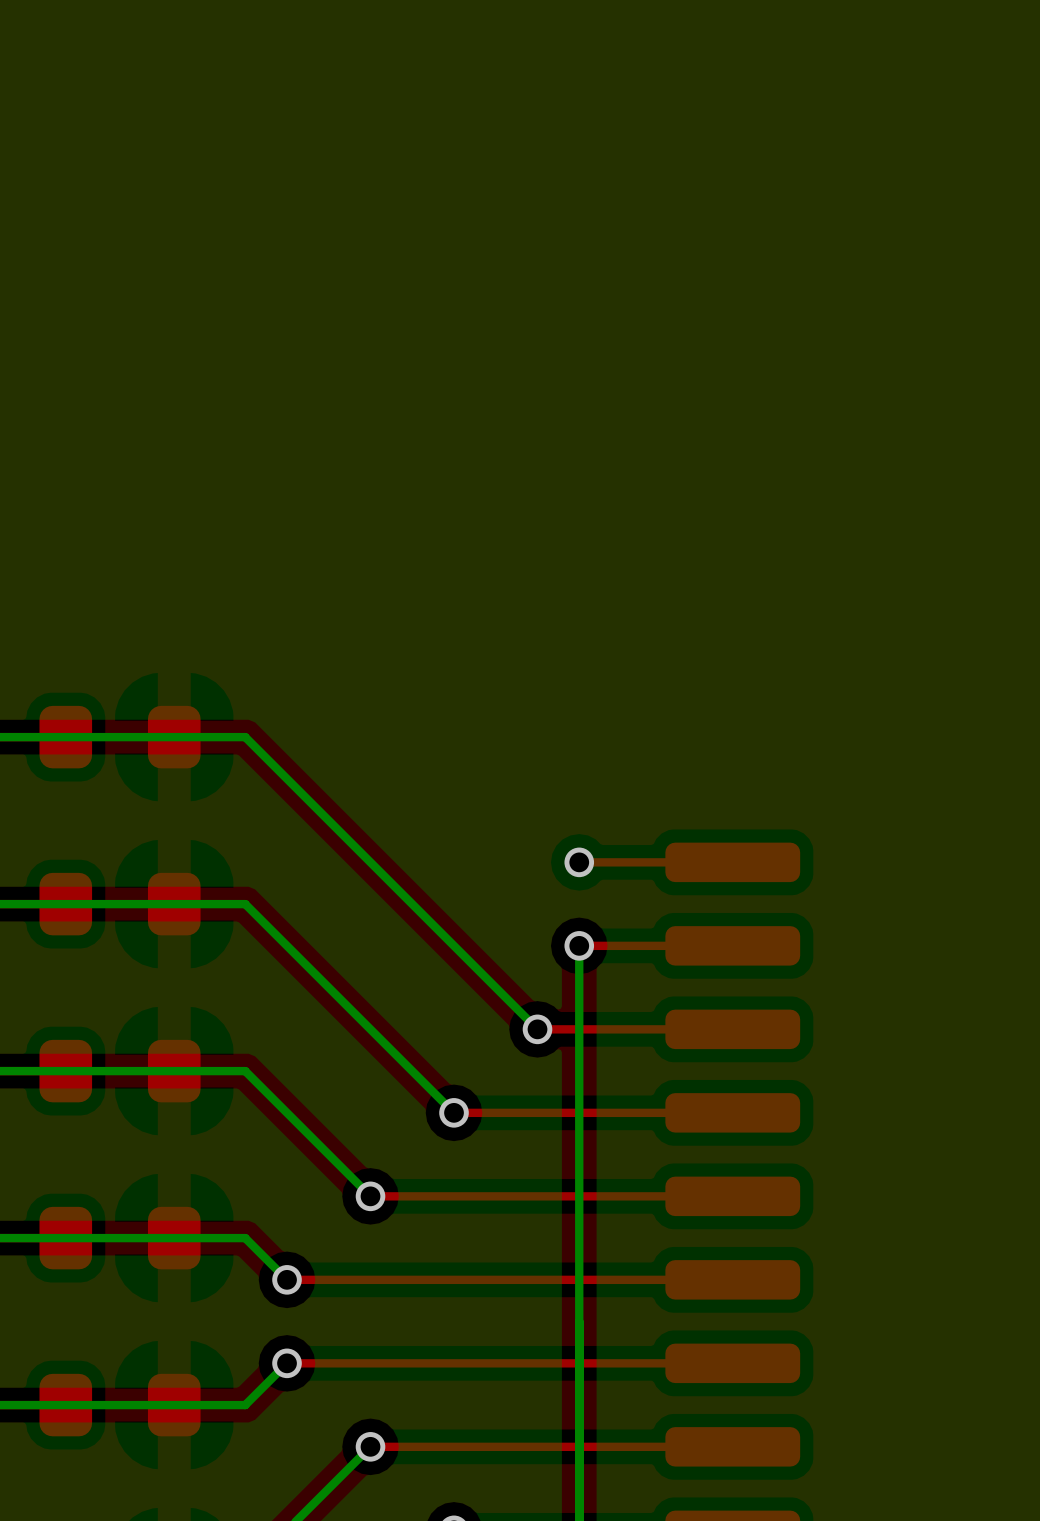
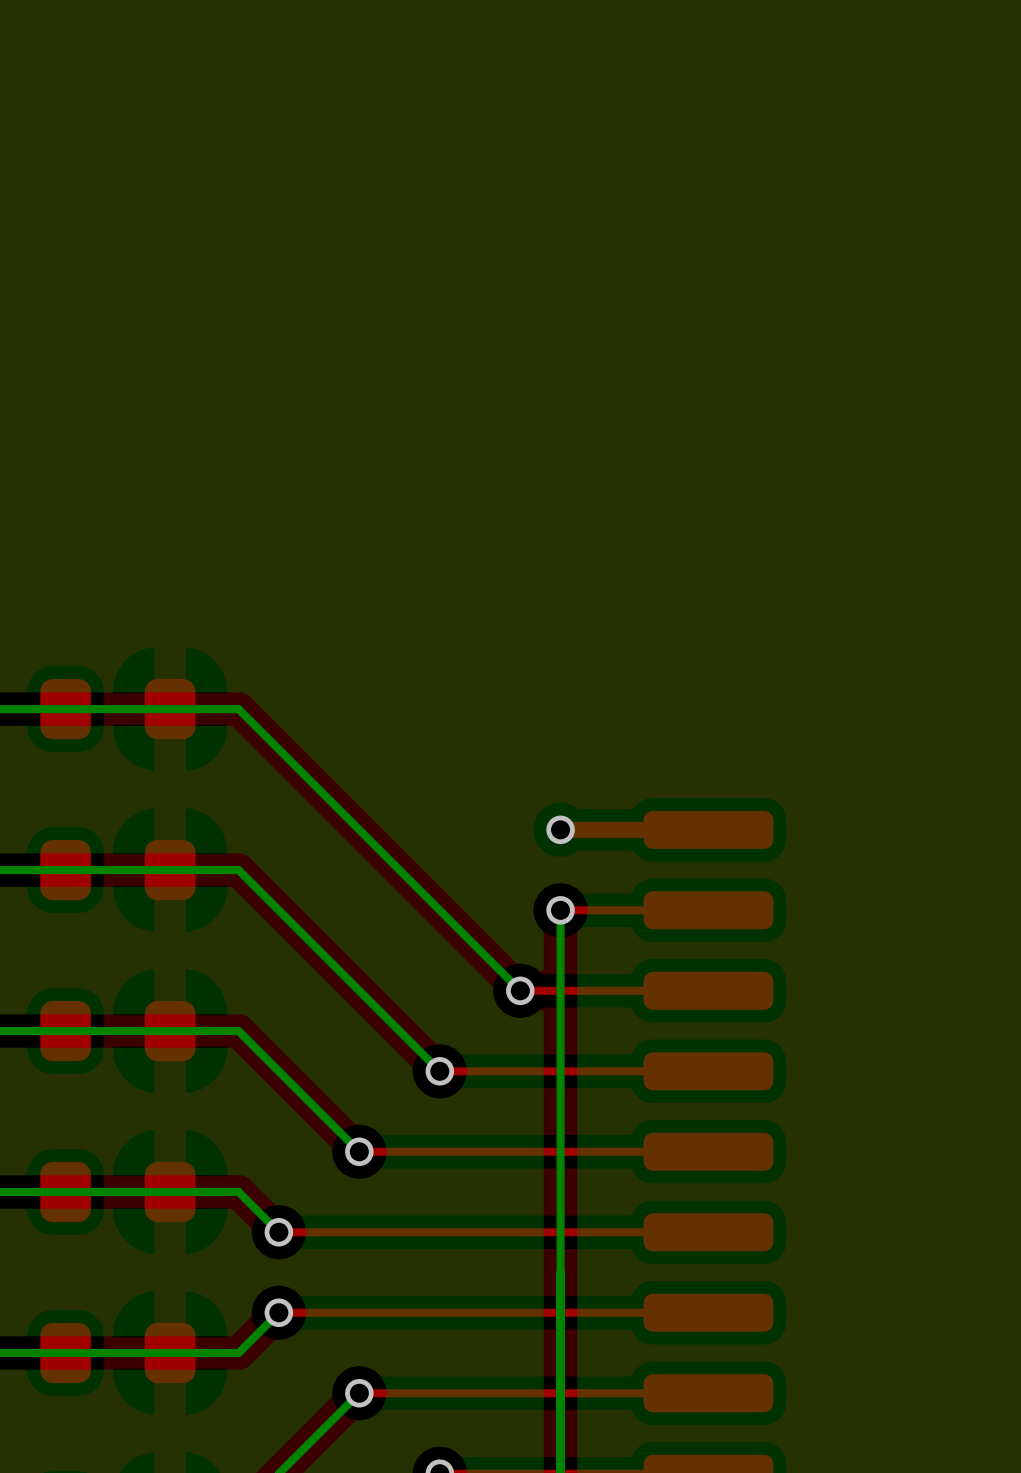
top track width: thin (732, 862) (579, 862) -> thick (708, 829) (560, 829)

